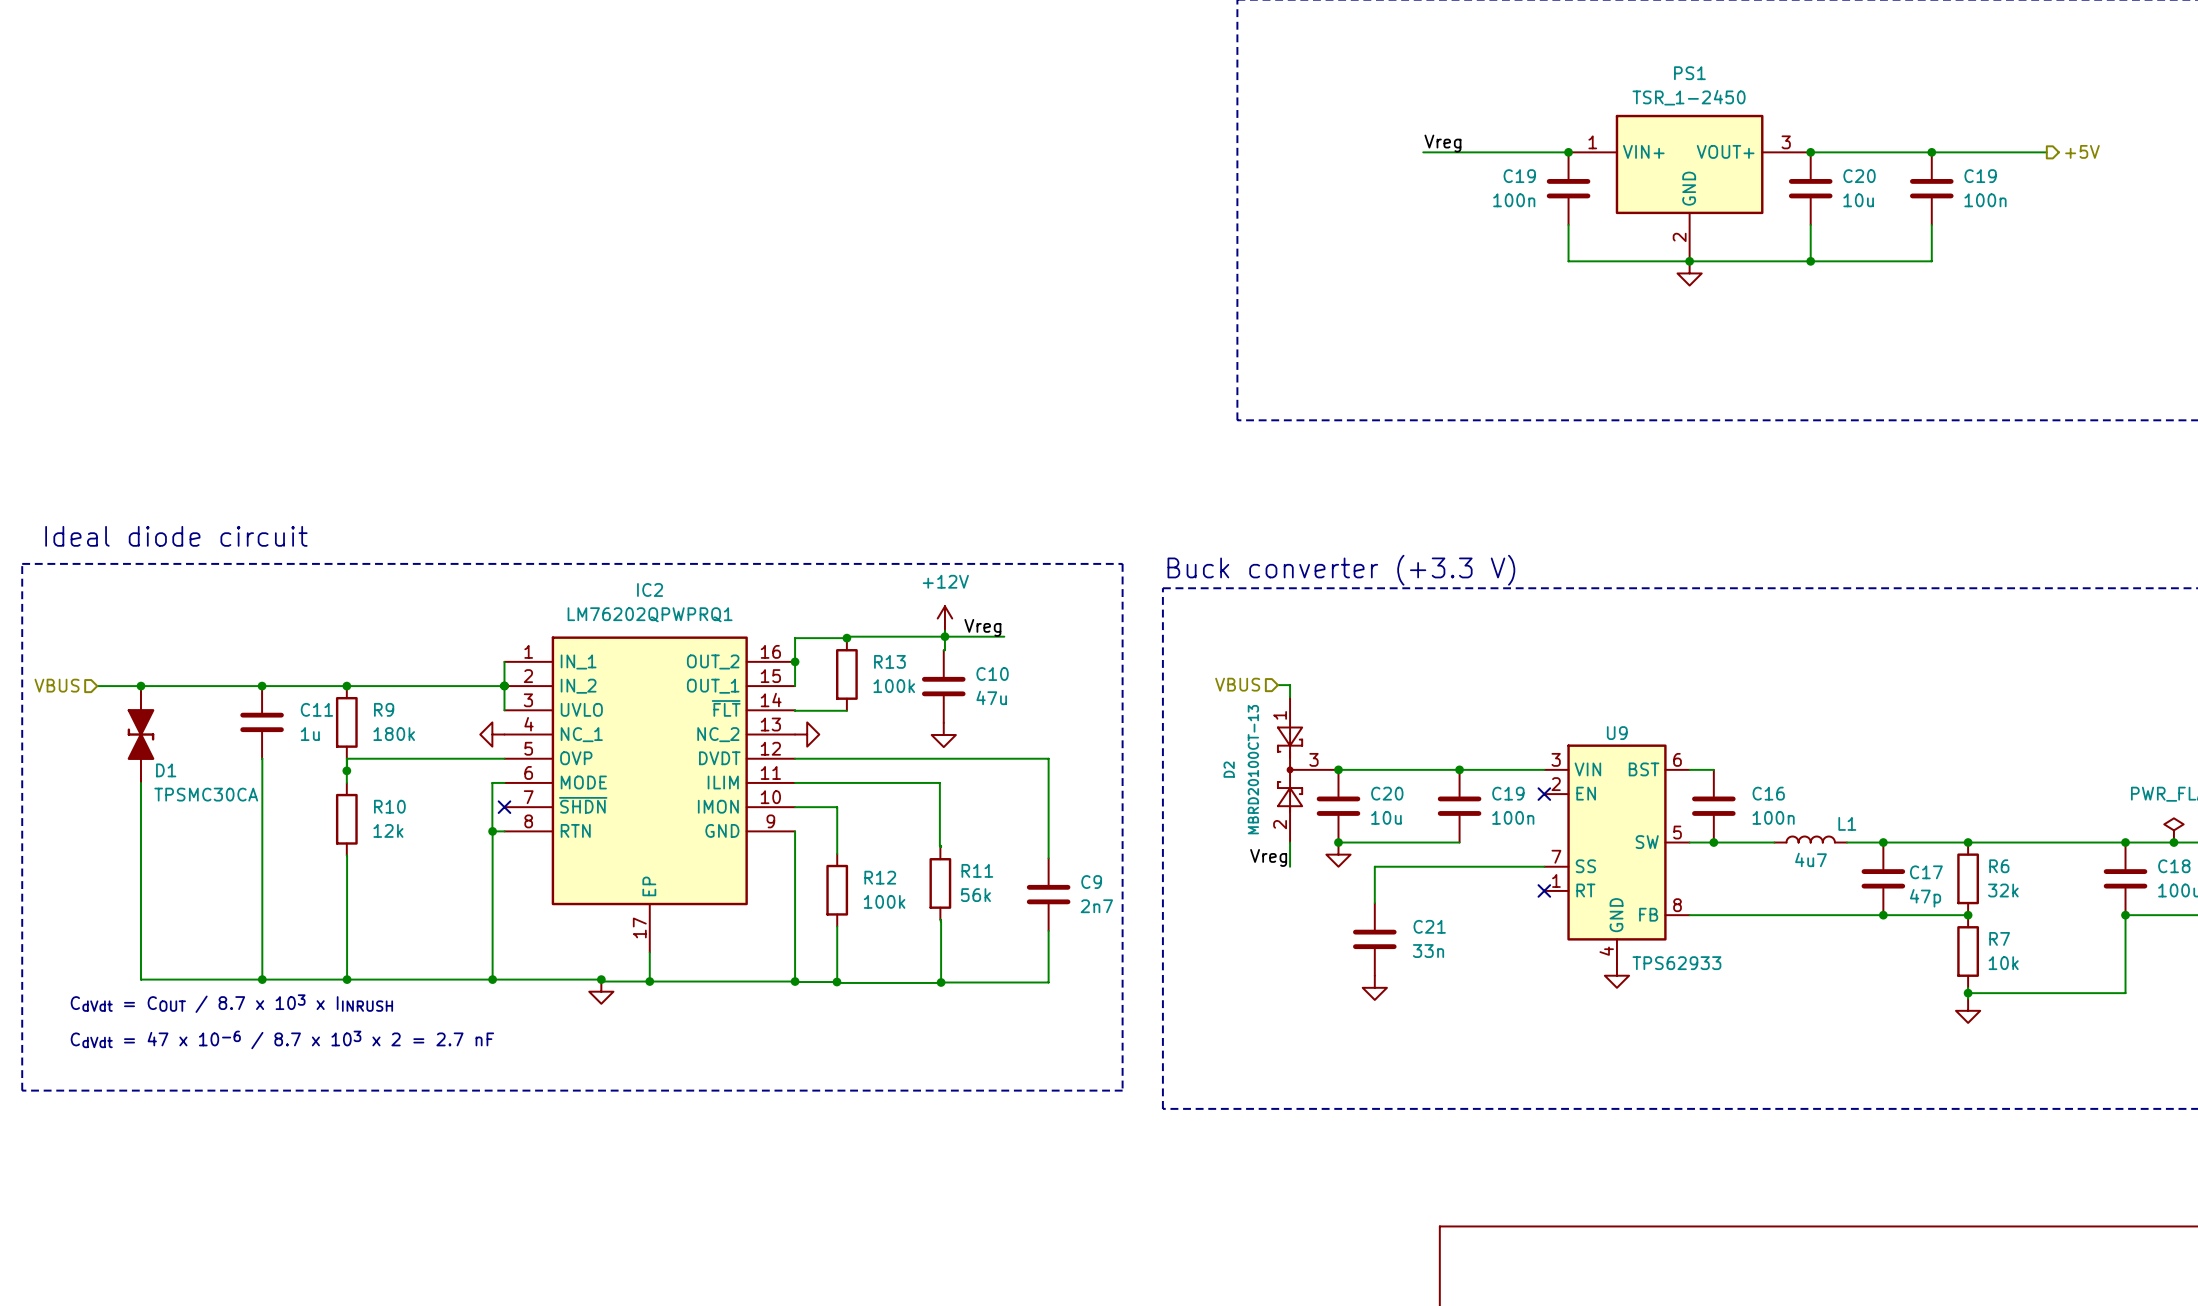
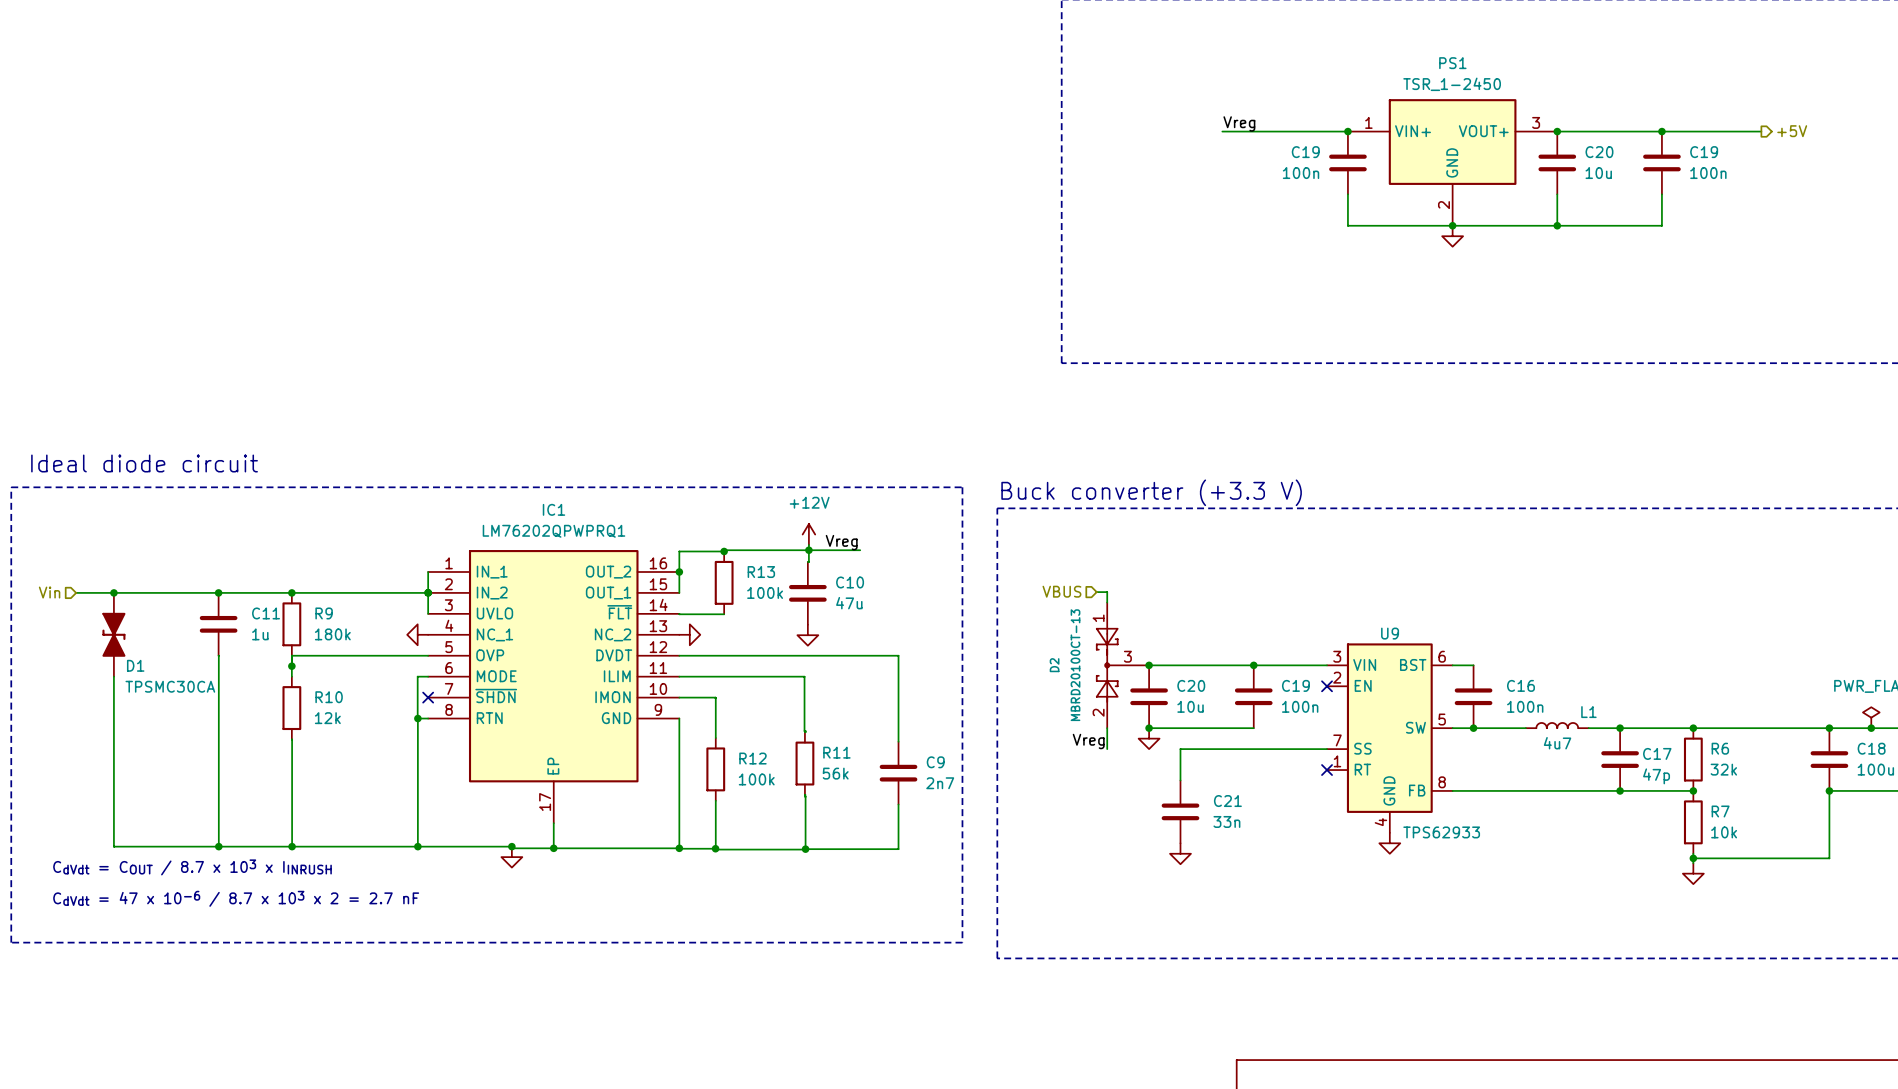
IC2 name: IC2 (650, 589) -> IC1 (553, 509)
hierarchical label: VBUS (57, 685) -> Vin (49, 592)

